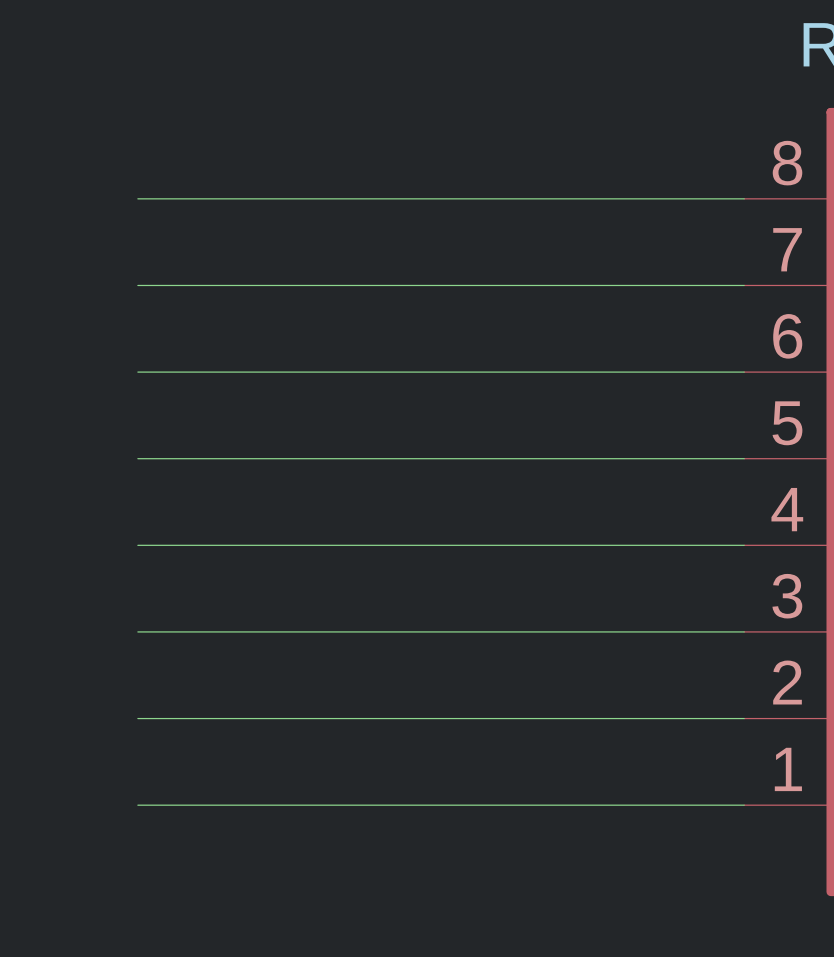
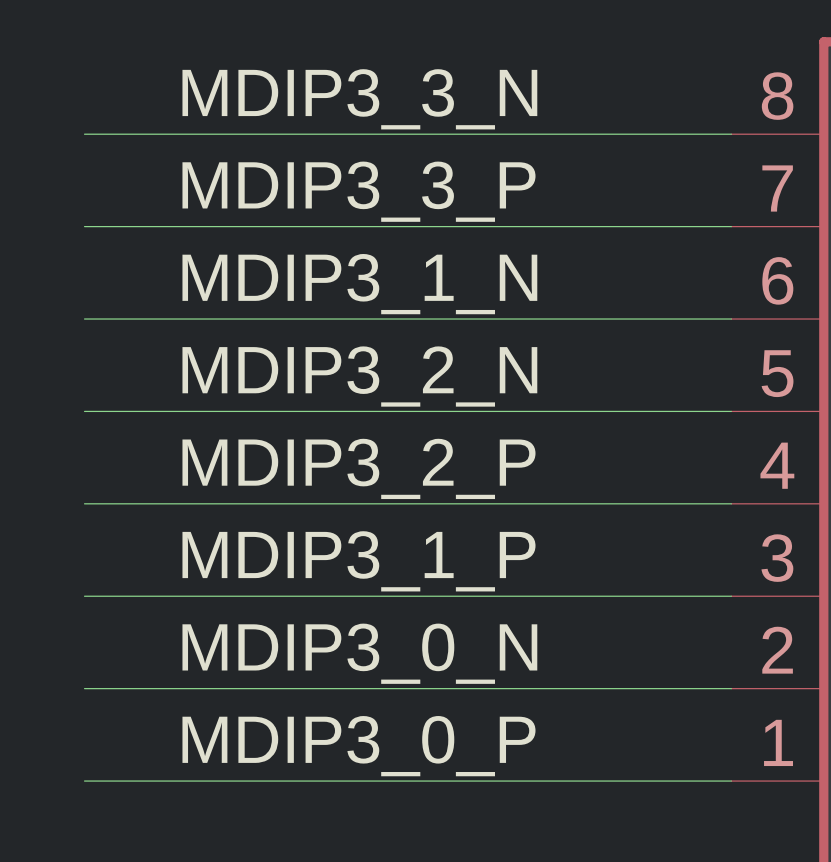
label: none -> MDIP3_3_N (359, 99)
label: none -> MDIP3_3_P (358, 191)
label: none -> MDIP3_1_N (359, 284)
label: none -> MDIP3_2_N (359, 376)
label: none -> MDIP3_2_P (358, 468)
label: none -> MDIP3_1_P (358, 561)
label: none -> MDIP3_0_N (359, 653)
label: none -> MDIP3_0_P (358, 746)

